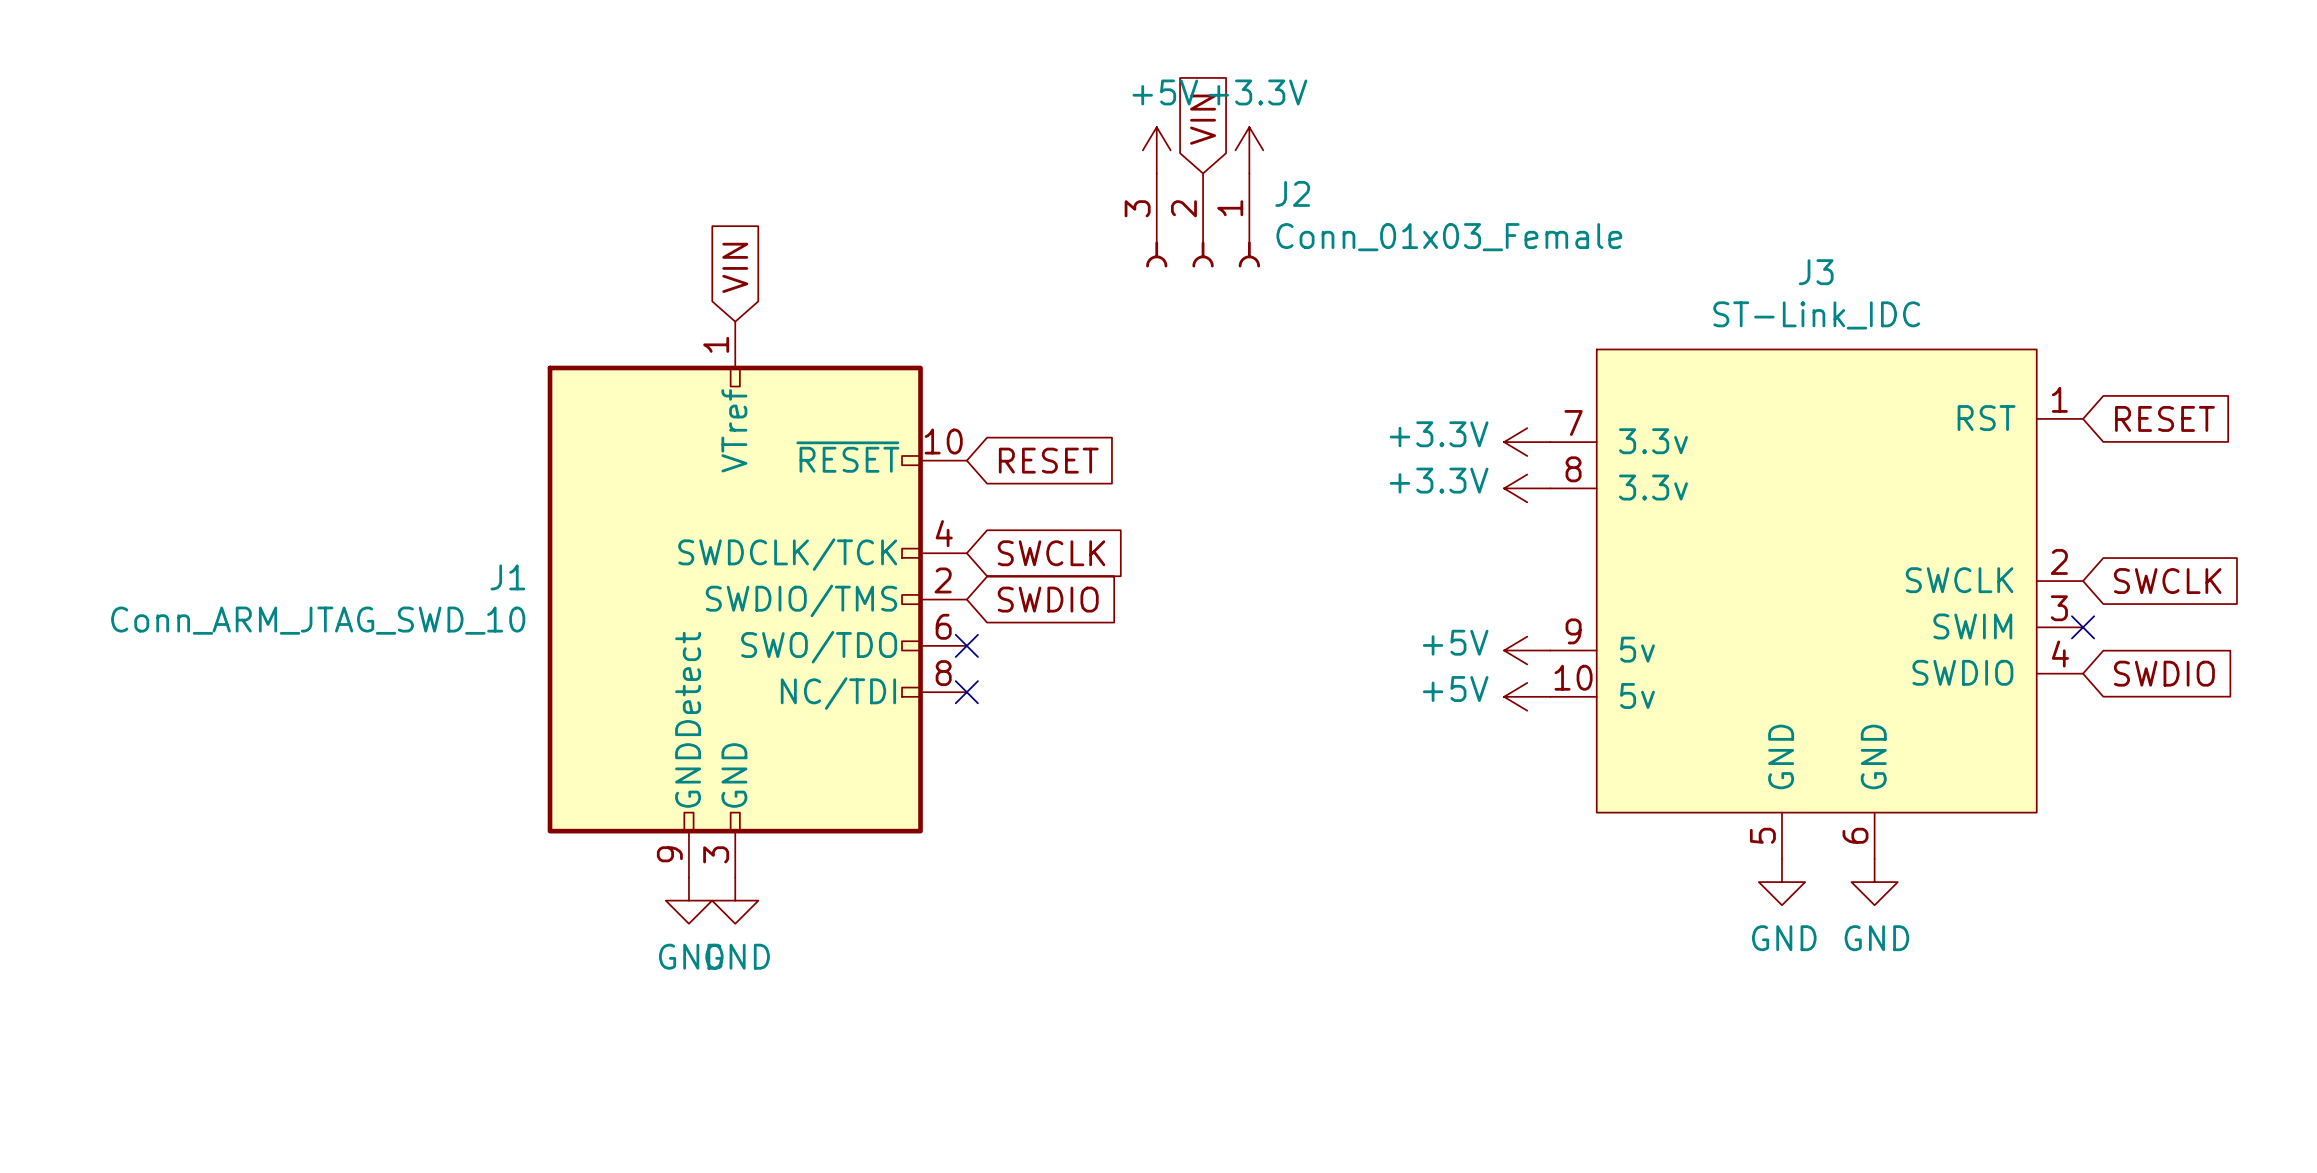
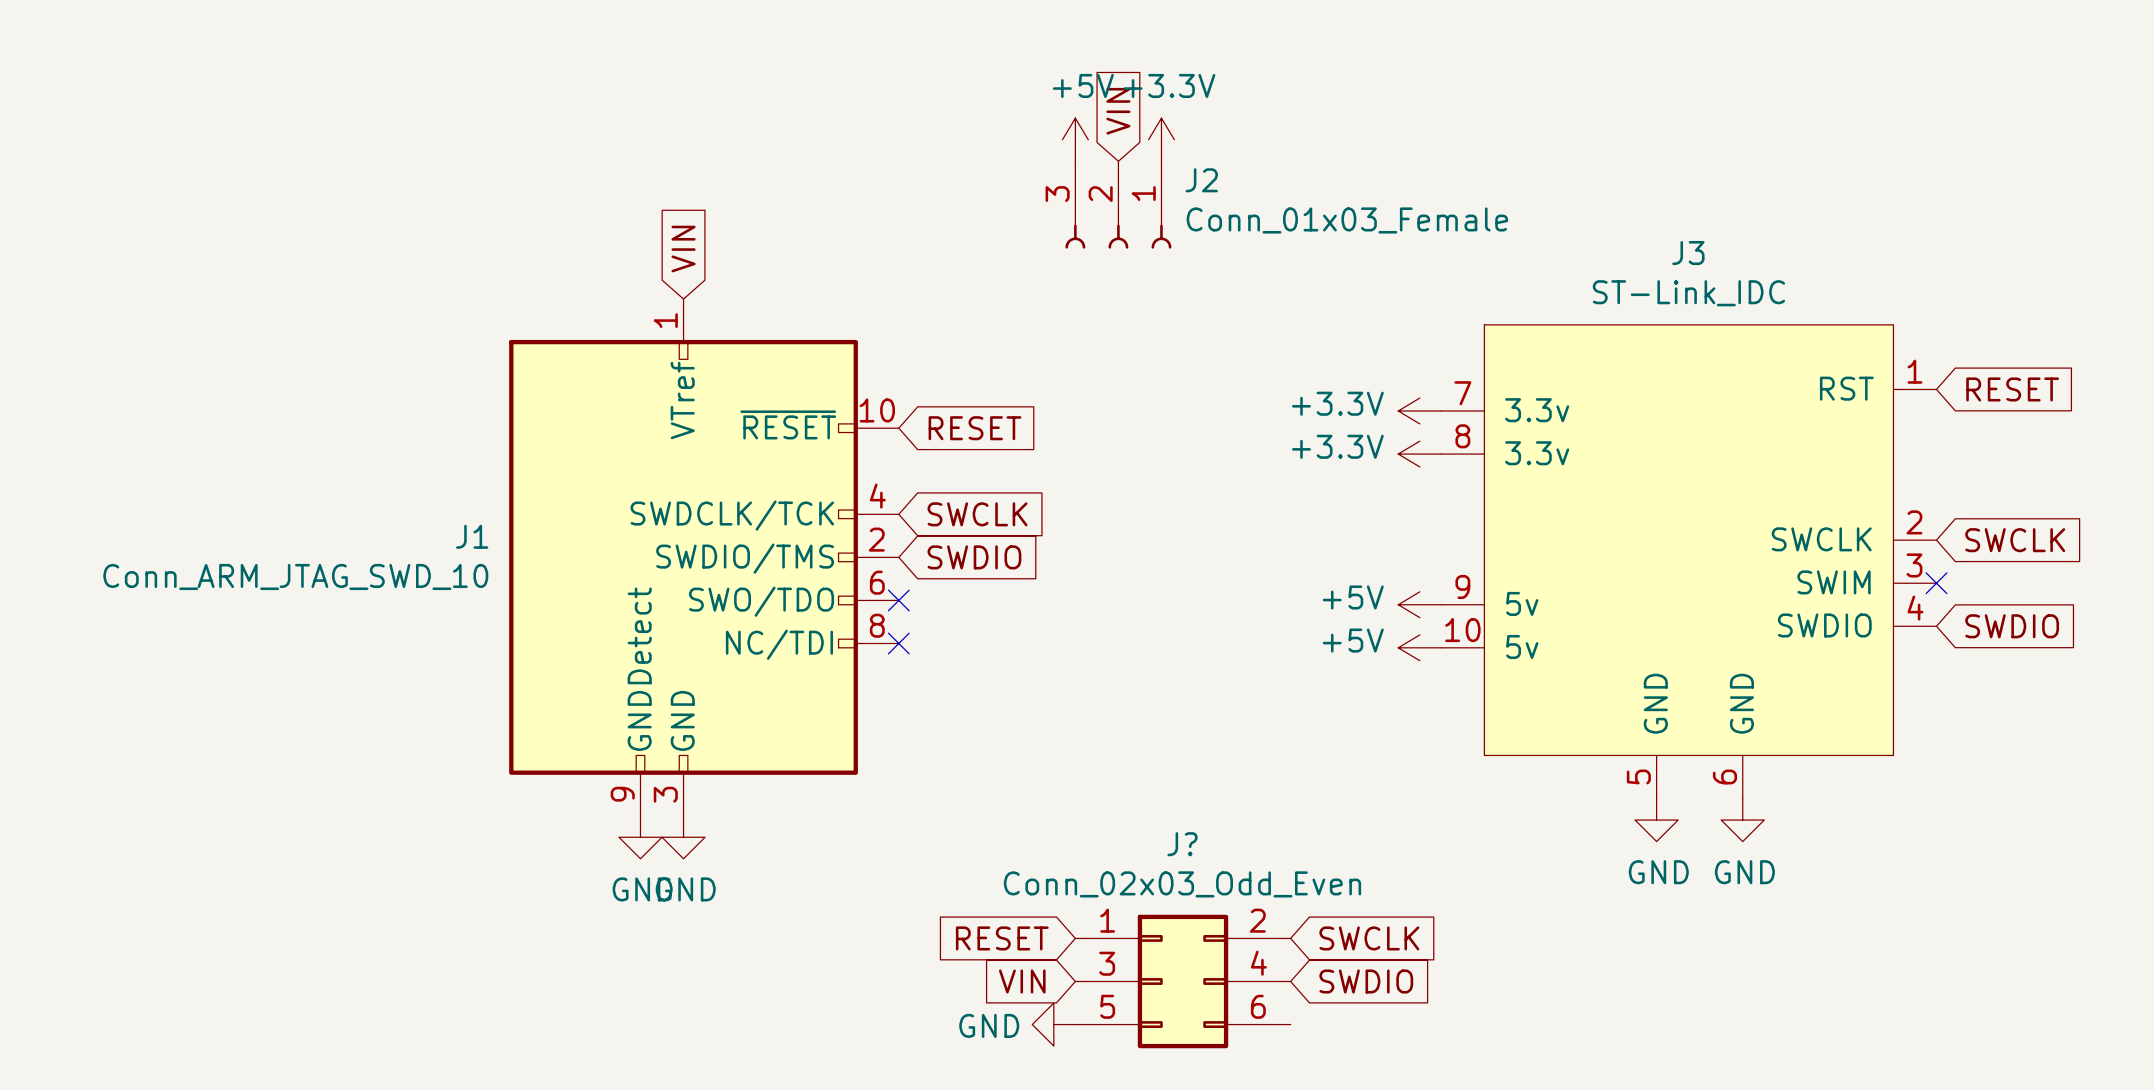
global label: none -> RESET (1002, 938)
global label: none -> SWCLK (1369, 938)
global label: none -> VIN (1022, 981)
J?: none -> Conn_02x03_Odd_Even (1183, 981)
global label: none -> SWDIO (1366, 981)
power symbol: none -> GND (1053, 1024)

